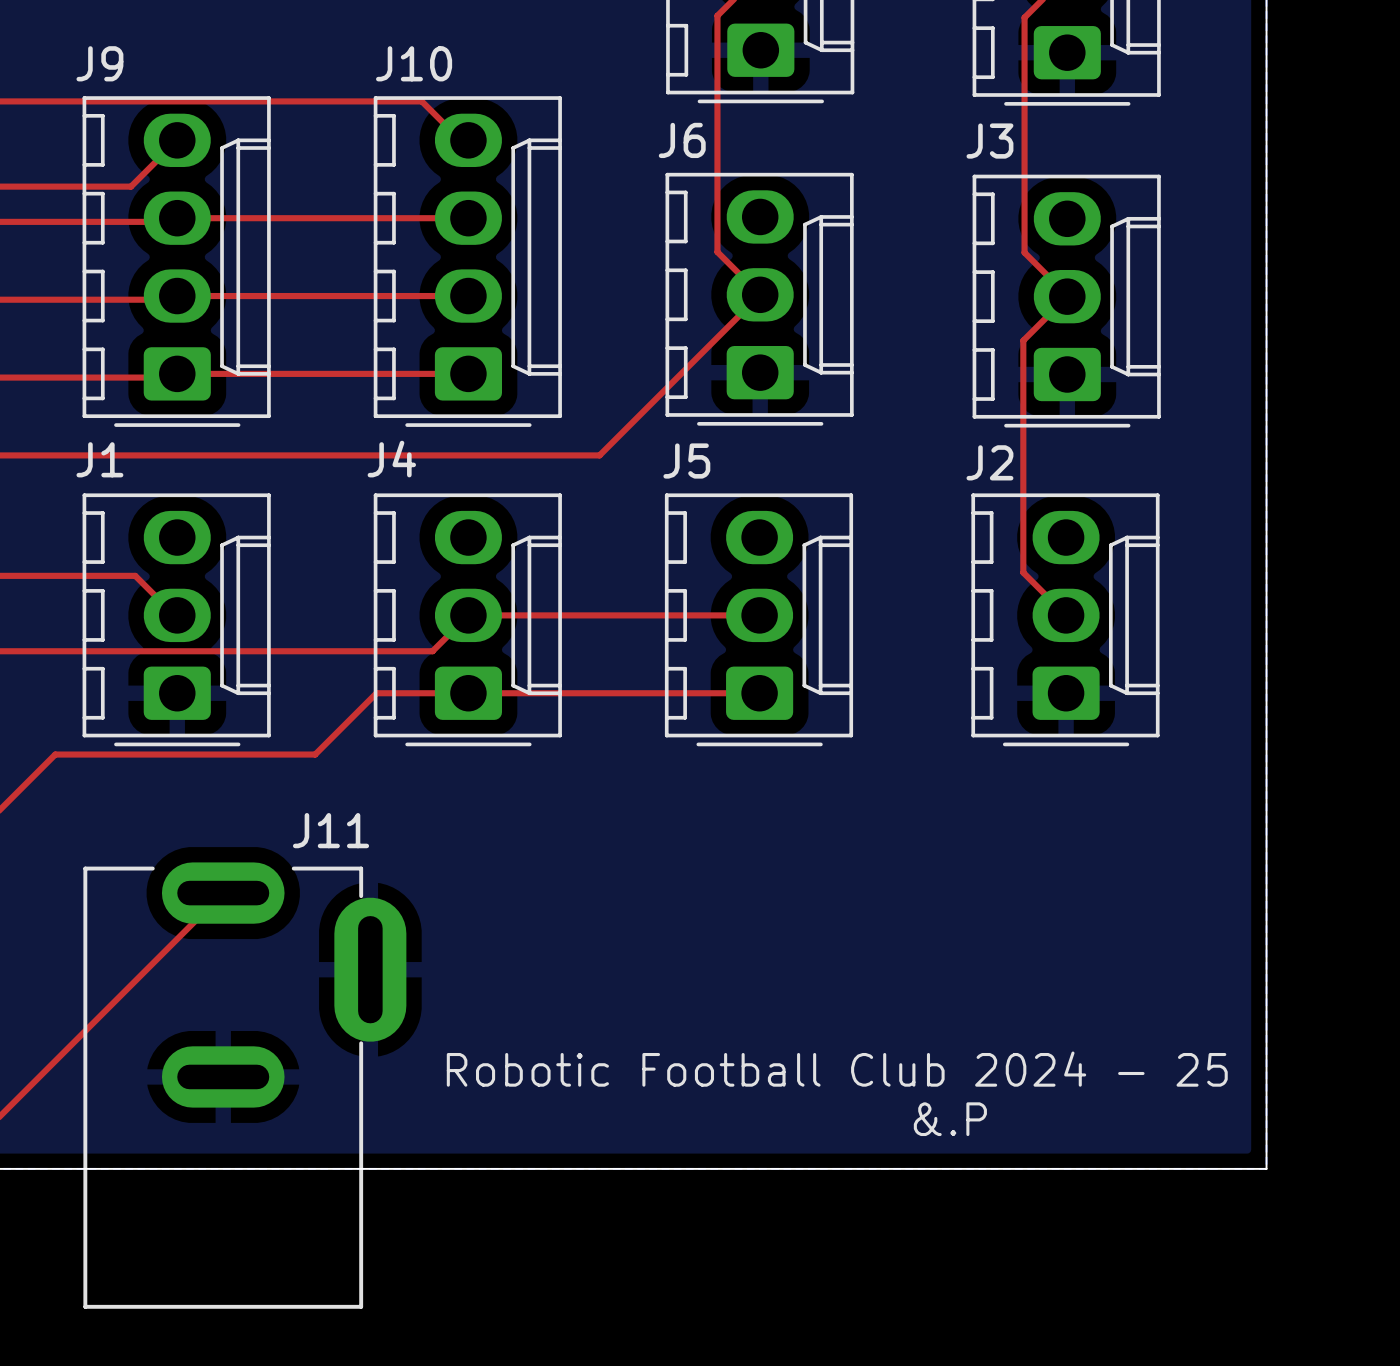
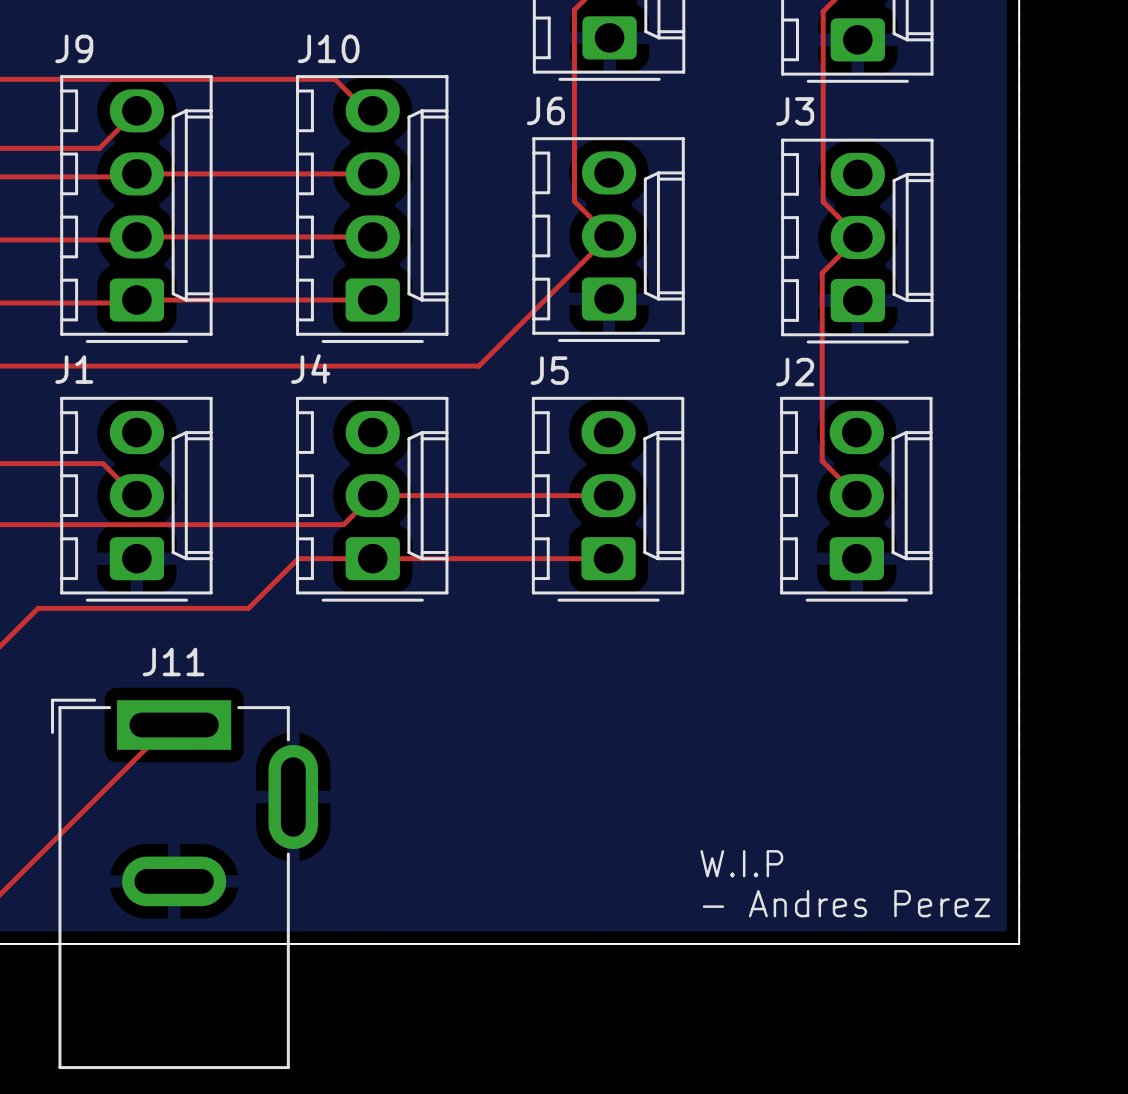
J11 name position: J11 (331, 830) -> J11 (173, 662)
J11 footprint: [83, 862, 407, 1309] -> [51, 698, 319, 1070]
text: Robotic Football Club 2024 - 25 (837, 1069) -> none
text: none -> W.I.P (741, 863)
text: &.P (950, 1119) -> none
text: none -> - Andres Perez (846, 903)

